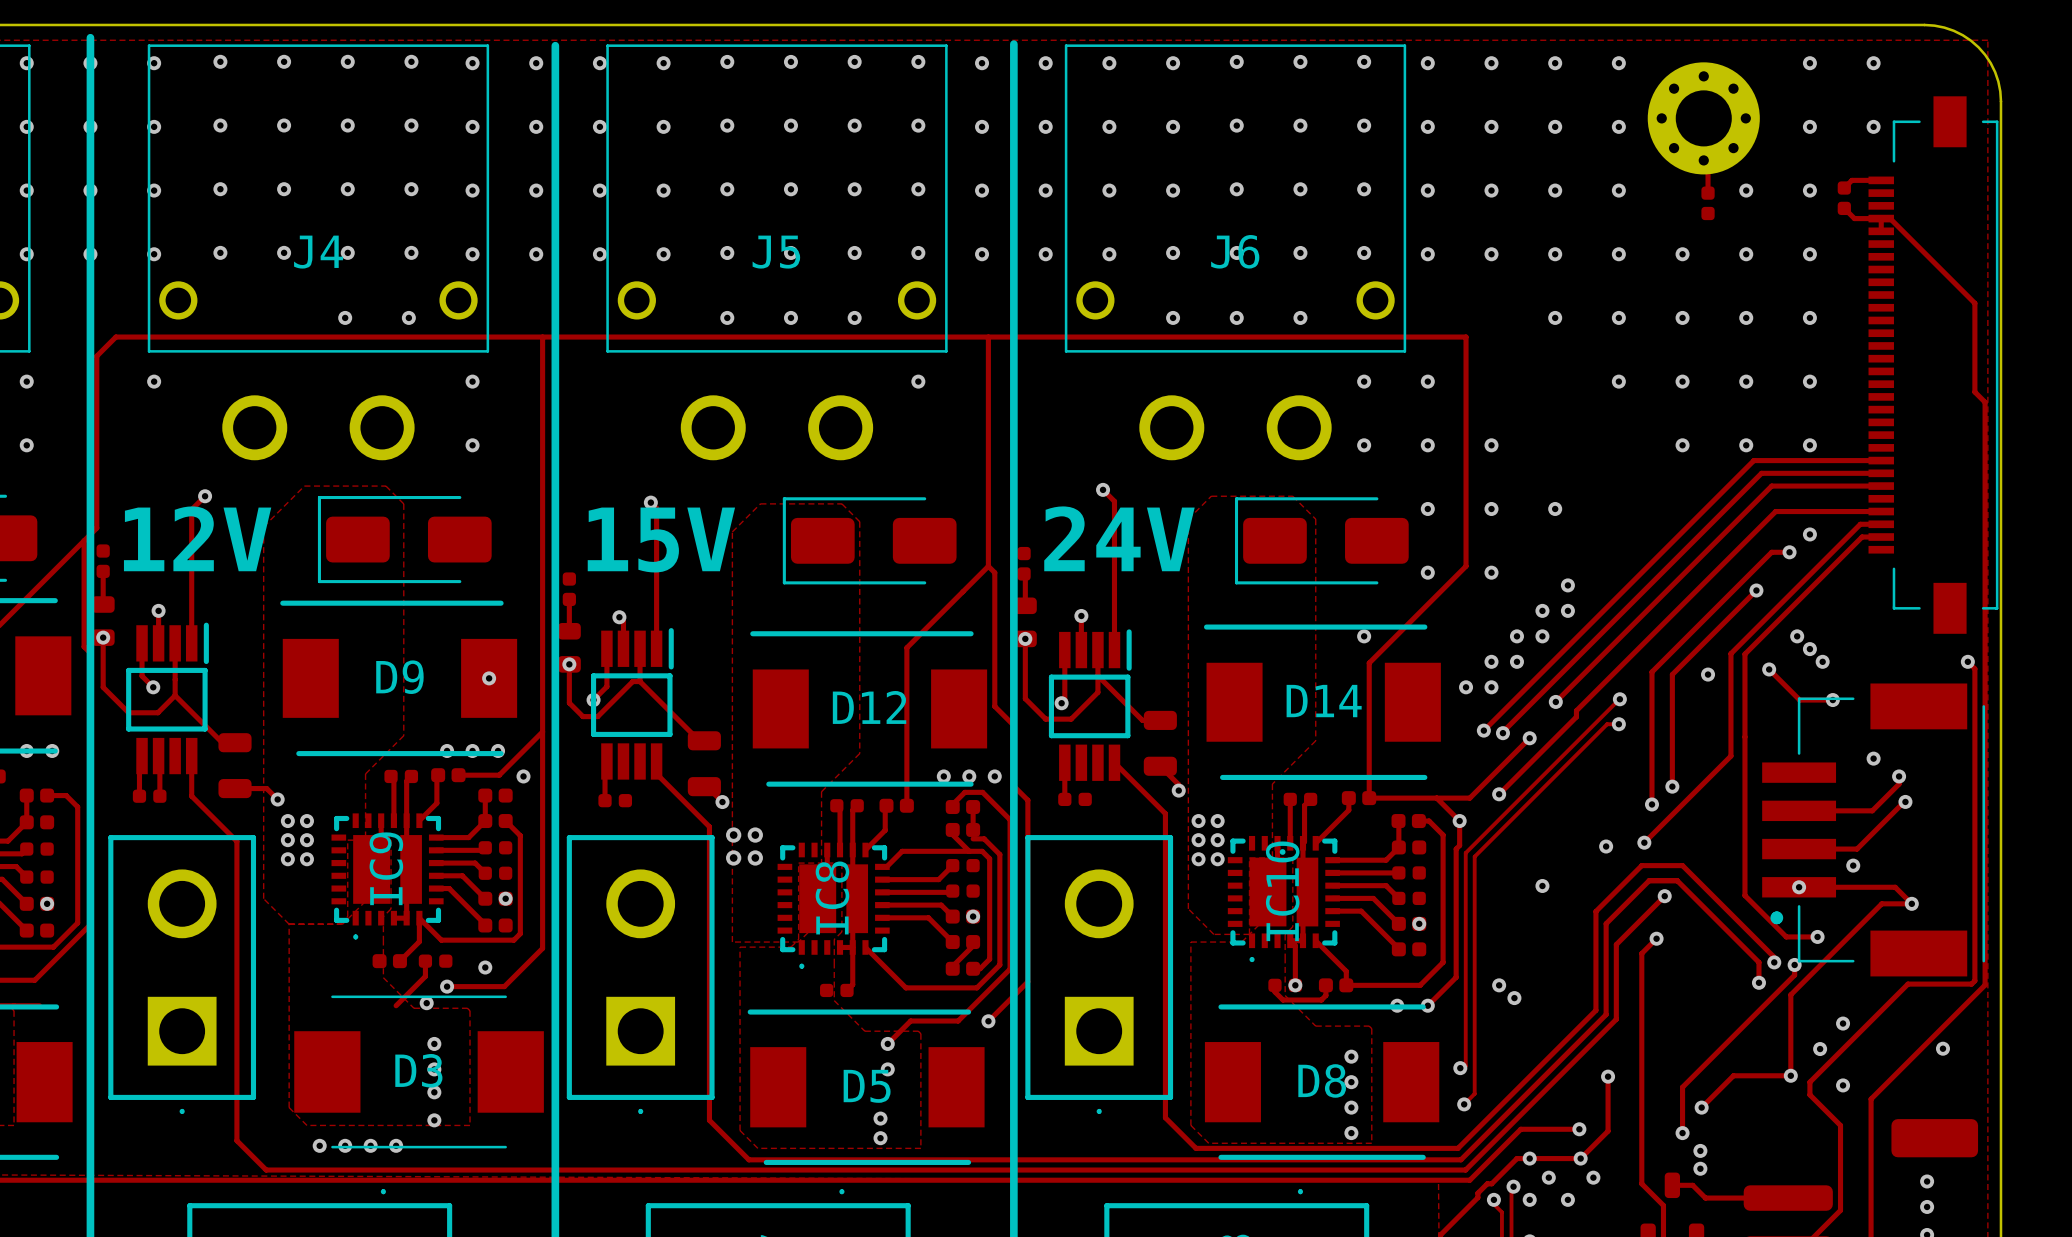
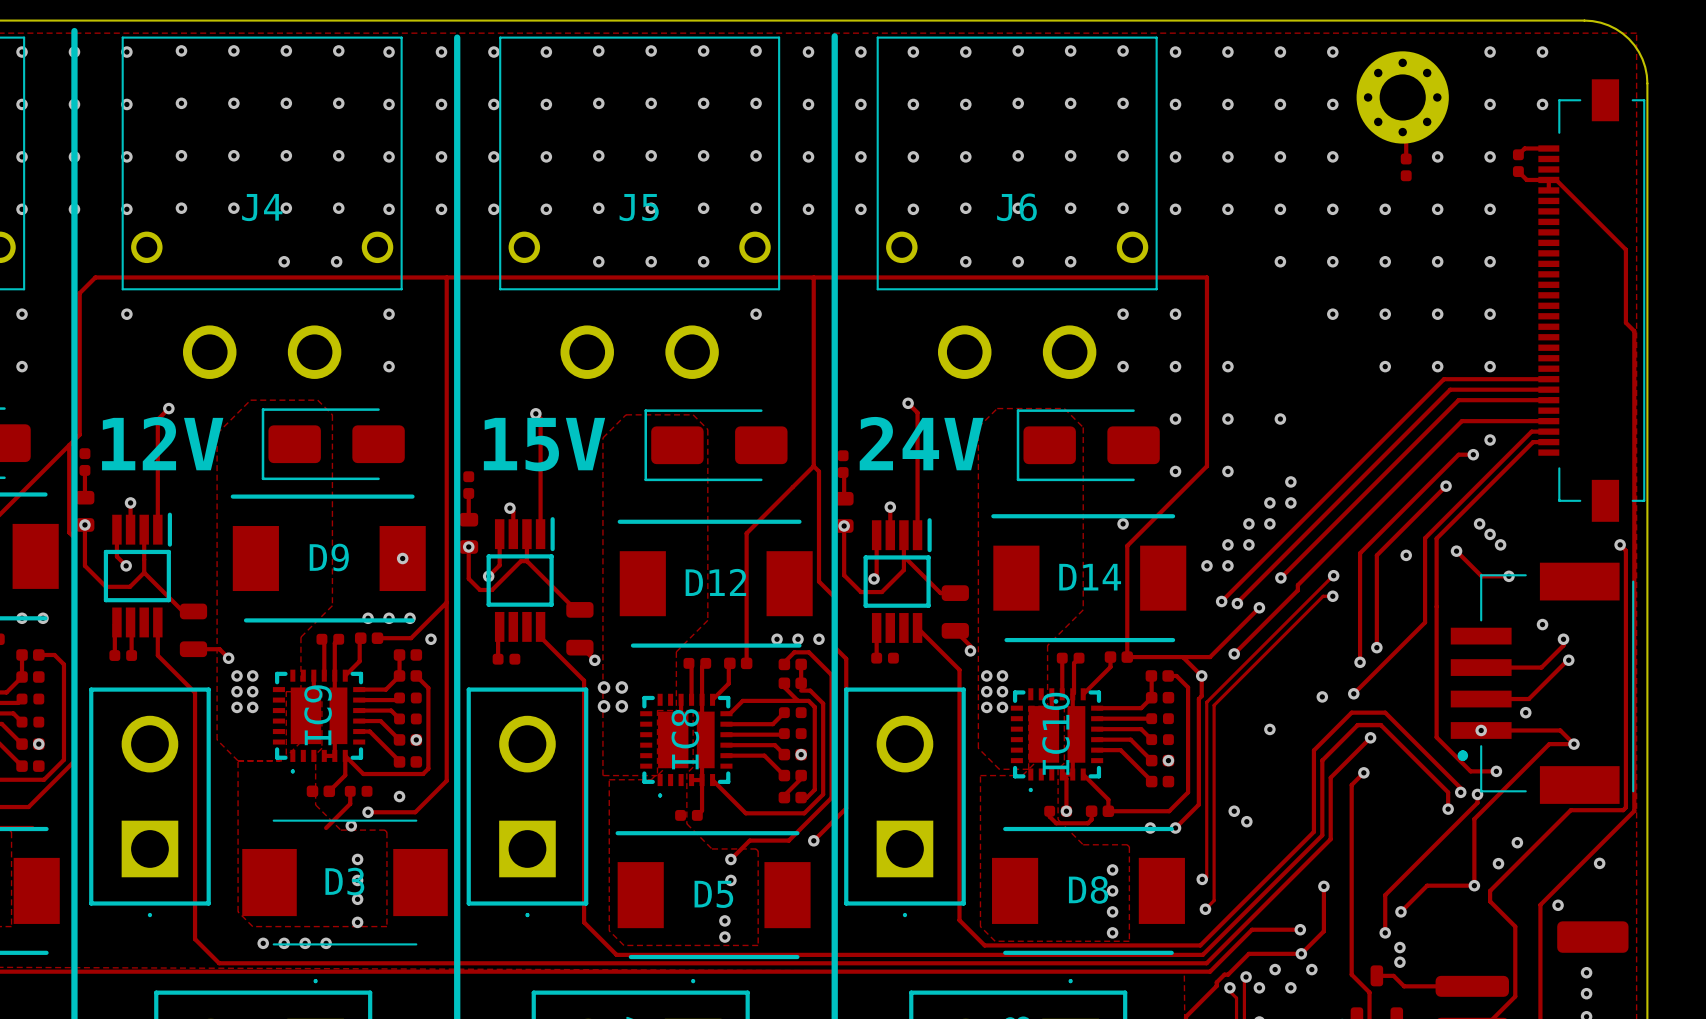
via position: (1843, 1085) -> (1558, 905)
via: (1529, 1158) -> none

